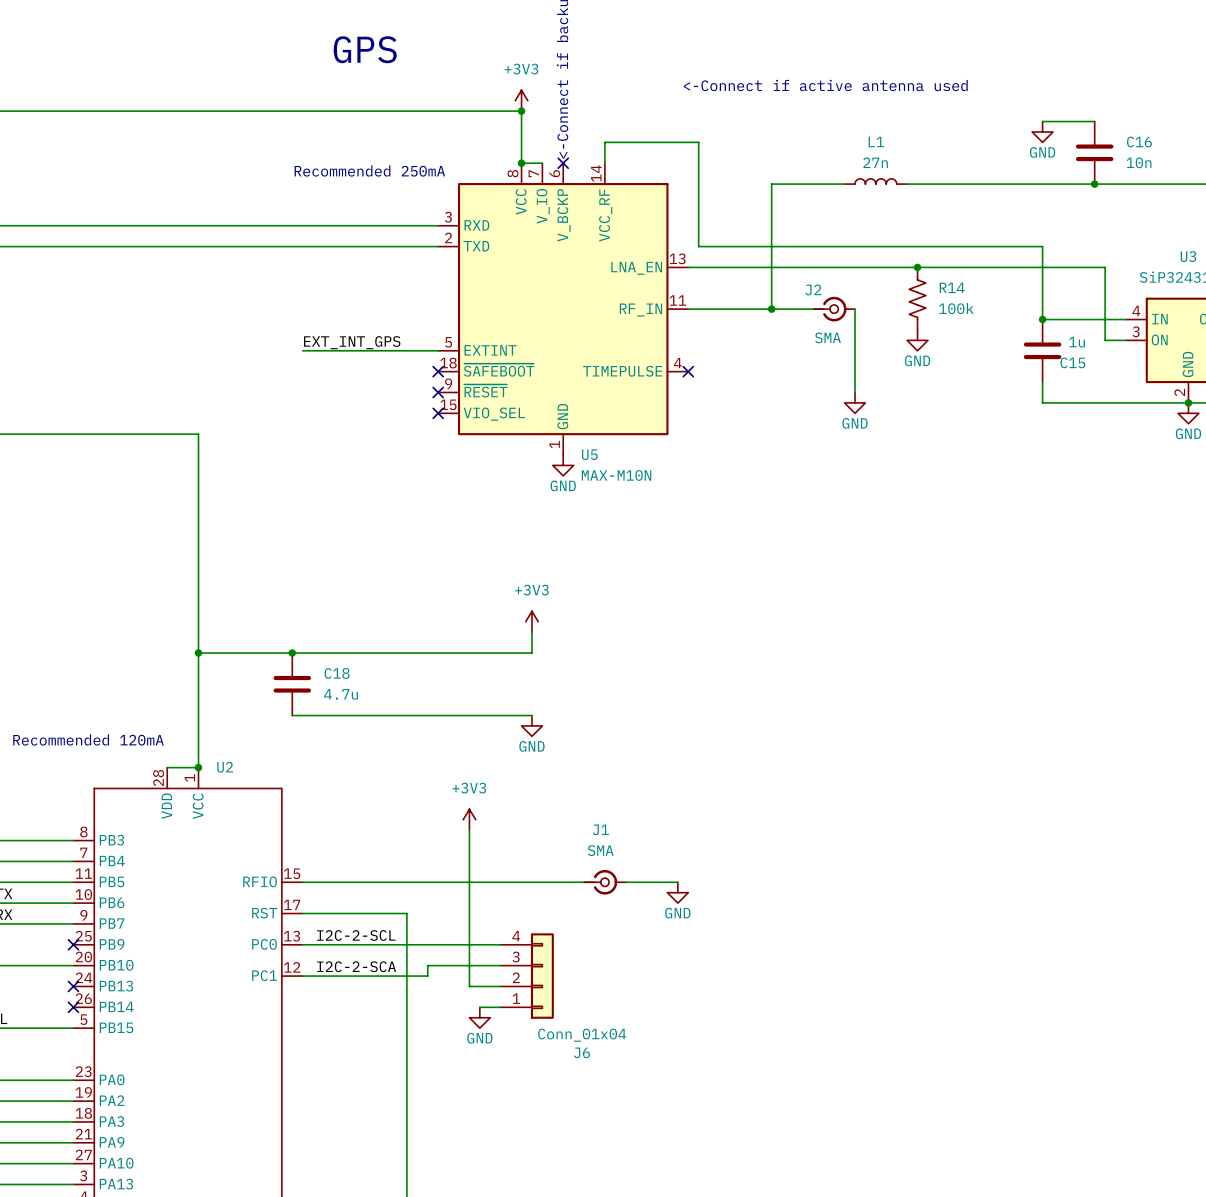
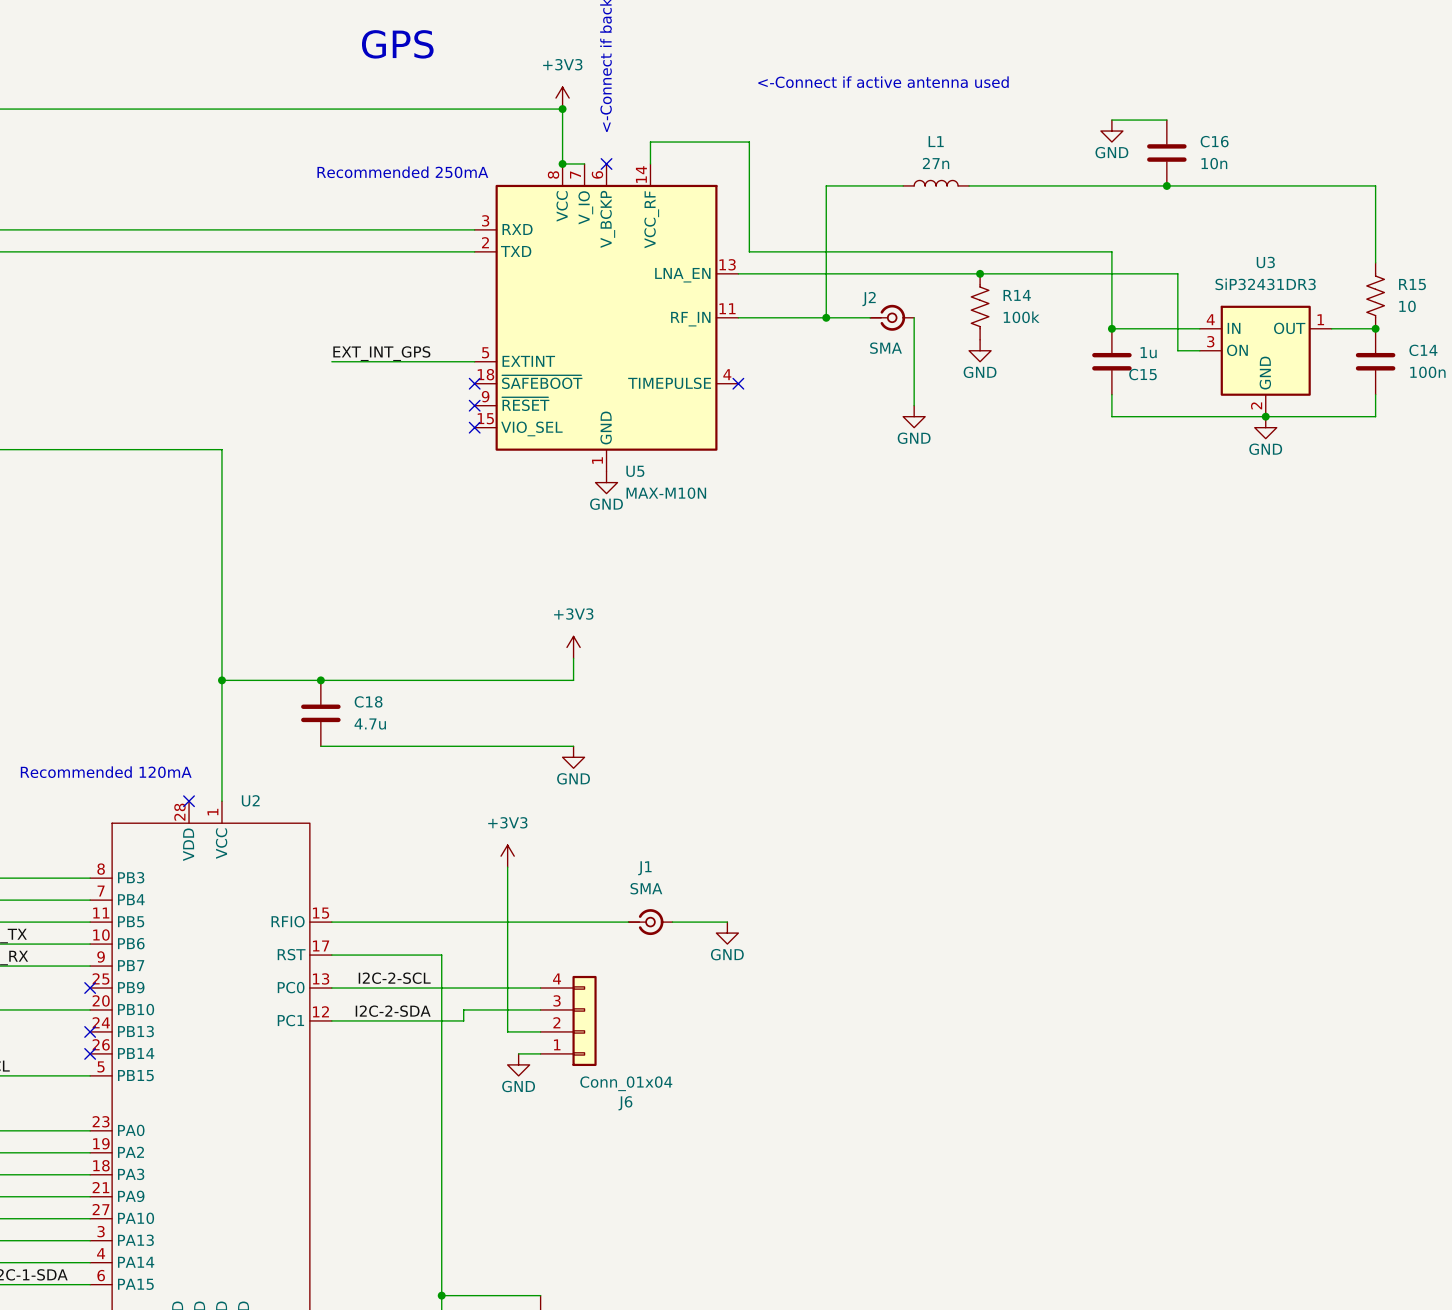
wire: (167, 767) (198, 767) -> none
no-connect mark: none -> (189, 801)
junction: (198, 767) -> none
label: I2C-2-SCA (356, 966) -> I2C-2-SDA (393, 1011)

